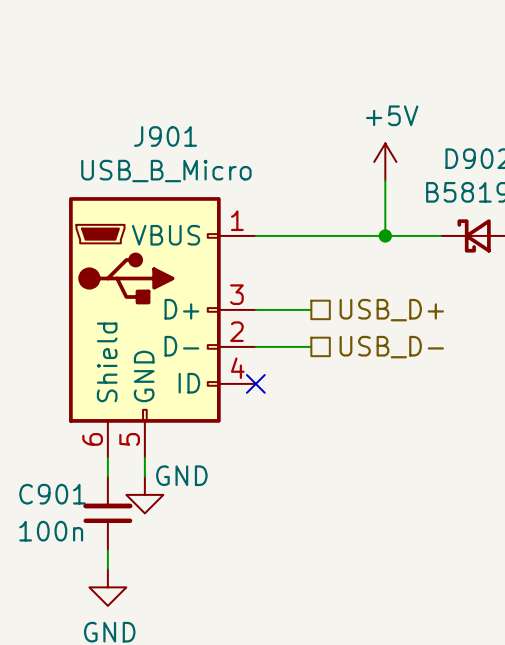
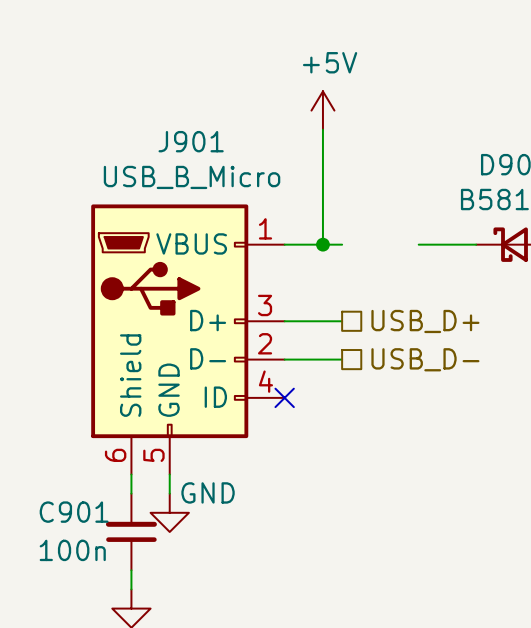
wire: none -> (322, 129) (322, 244)
power symbol position: +5V (385, 161) -> +5V (322, 110)
wire: (385, 180) (385, 235) (311, 235) -> none
junction: none -> (322, 244)
junction: (385, 235) -> none

